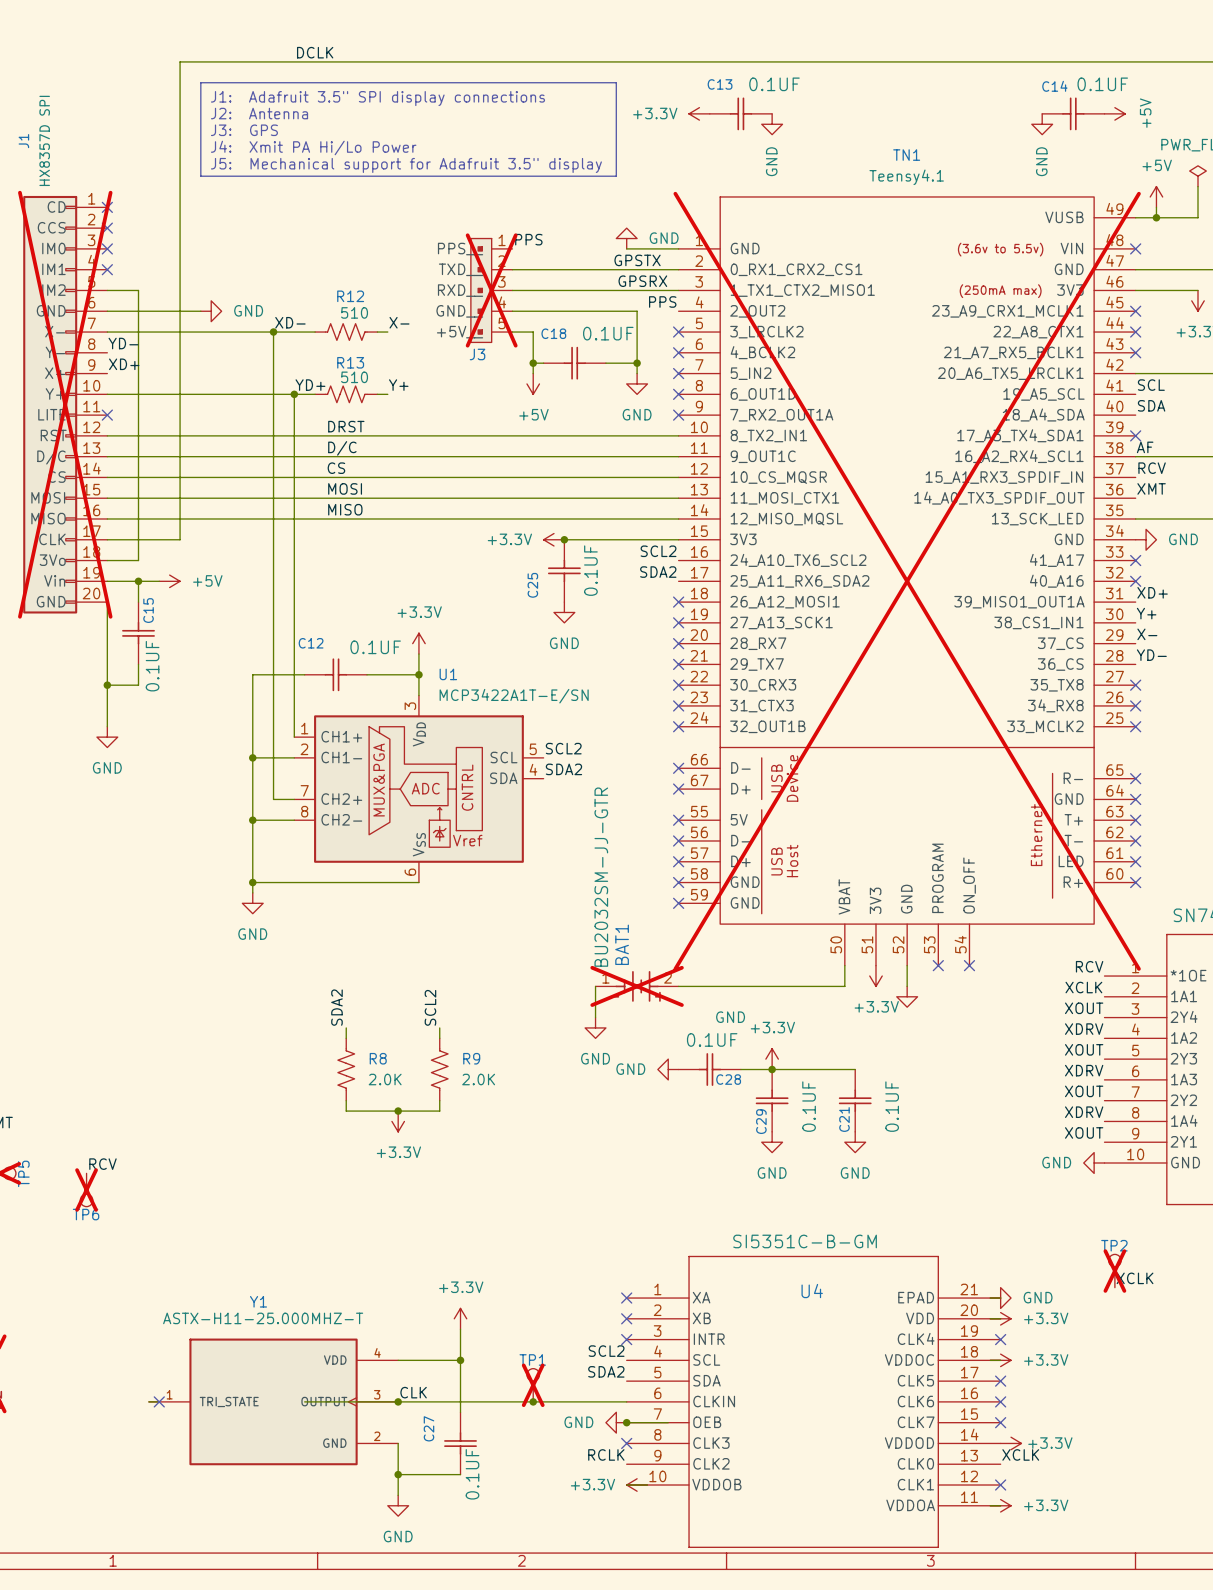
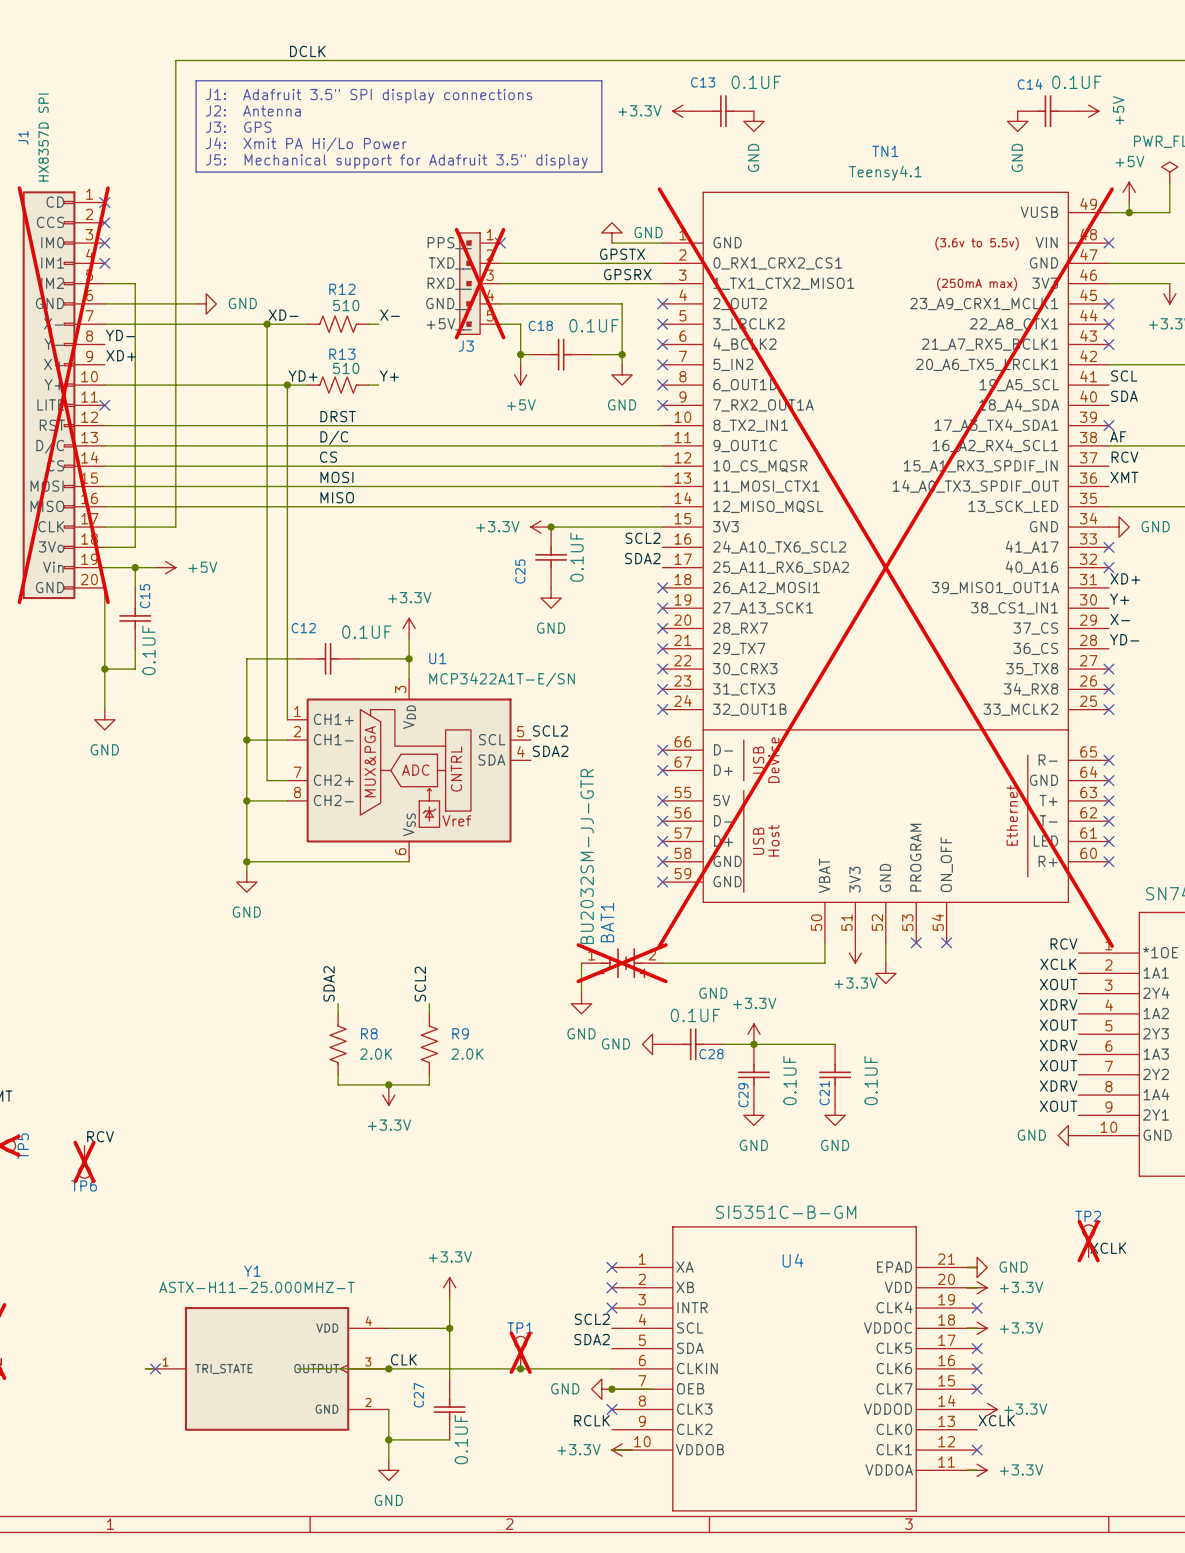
label: PPS (528, 239) -> none
no-connect mark: none -> (500, 243)
label: PPS (662, 301) -> none
no-connect mark: none -> (662, 303)

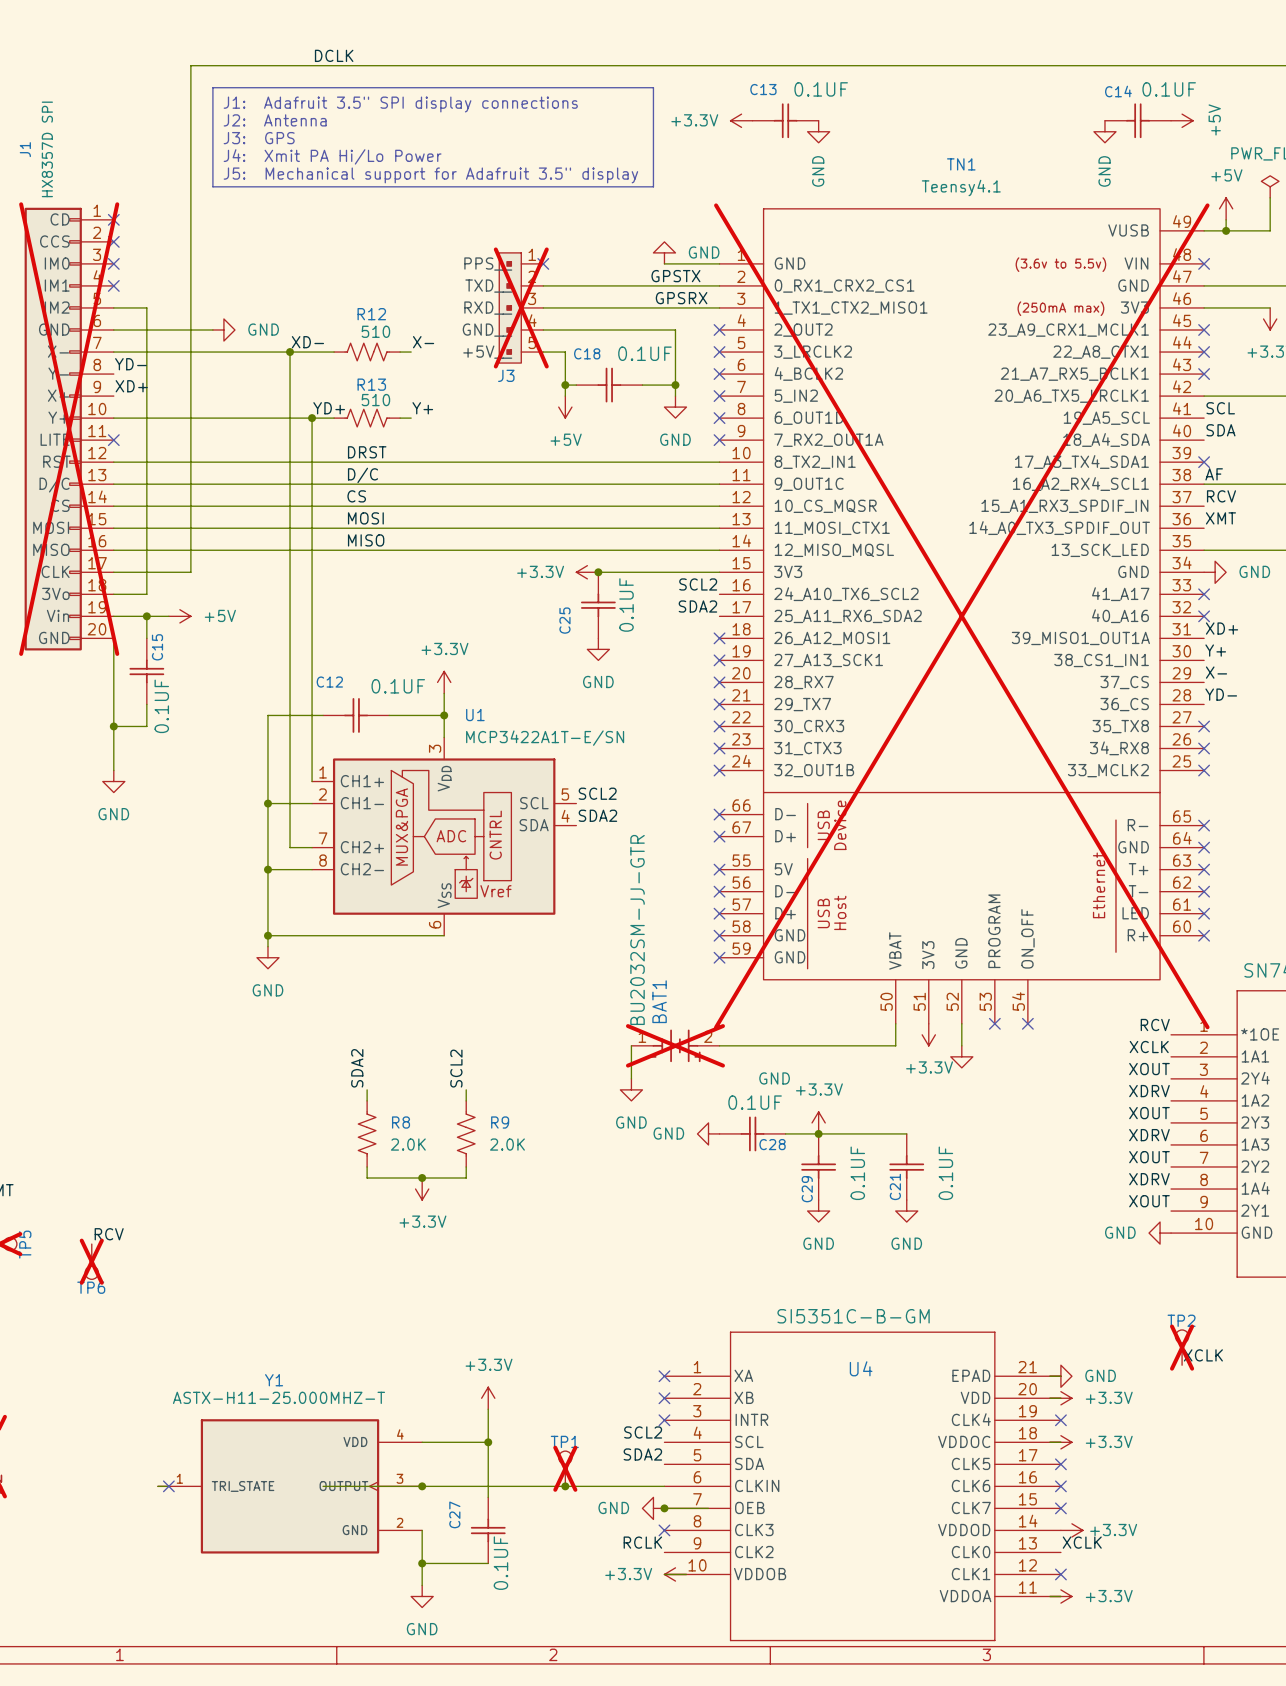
label: CLK (403, 1359) -> none

